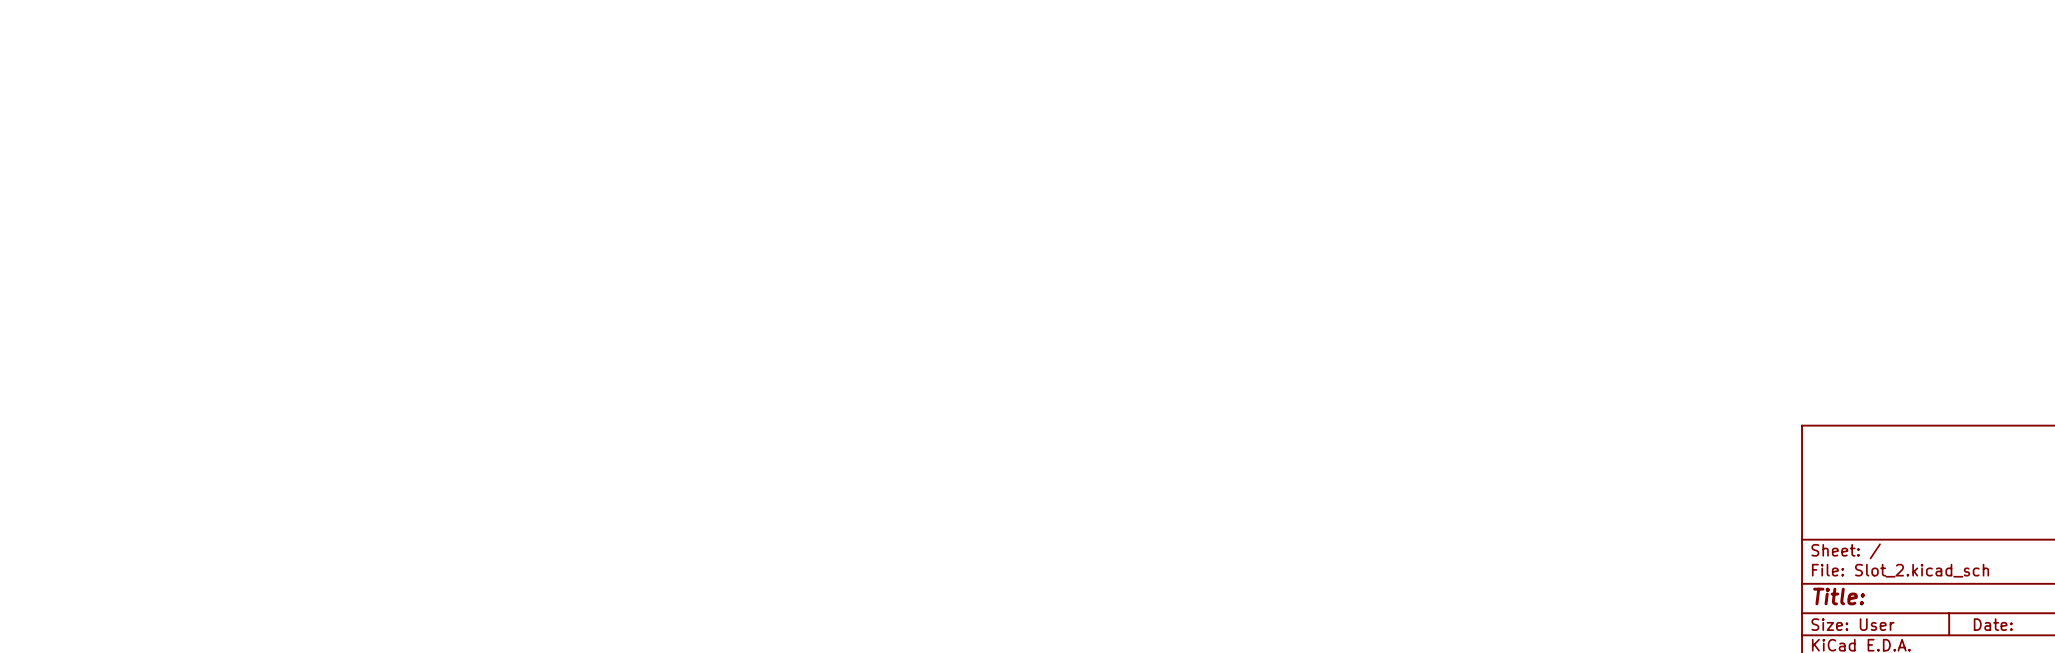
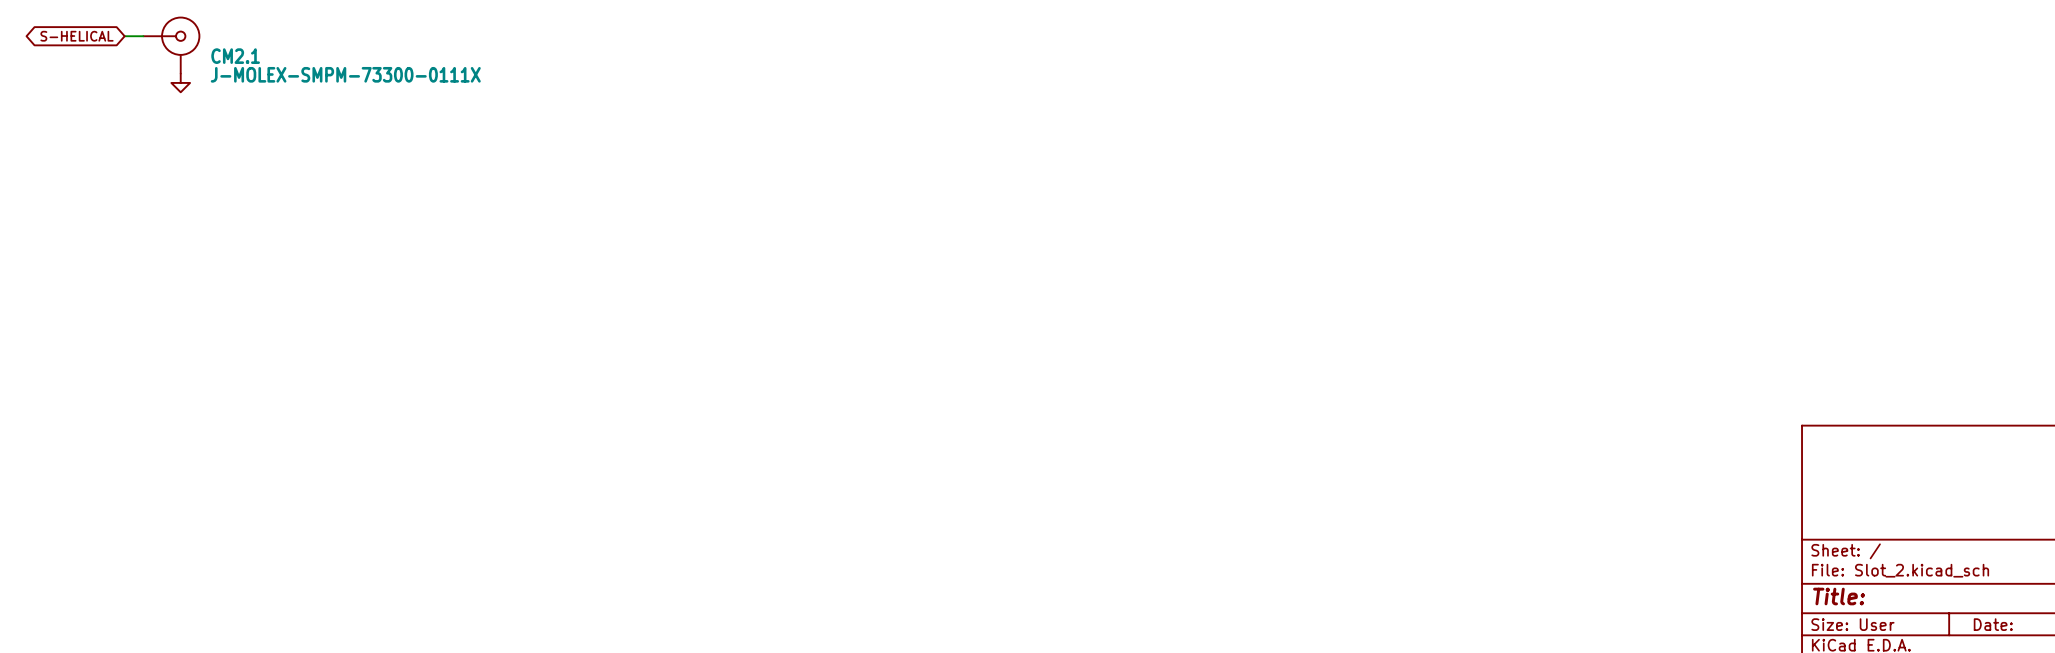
global label: none -> S-HELICAL (76, 36)
wire: none -> (124, 36) (143, 36)
CM2.1: none -> J-MOLEX-SMPM-73300-0111X (171, 45)
power symbol: none -> (180, 82)

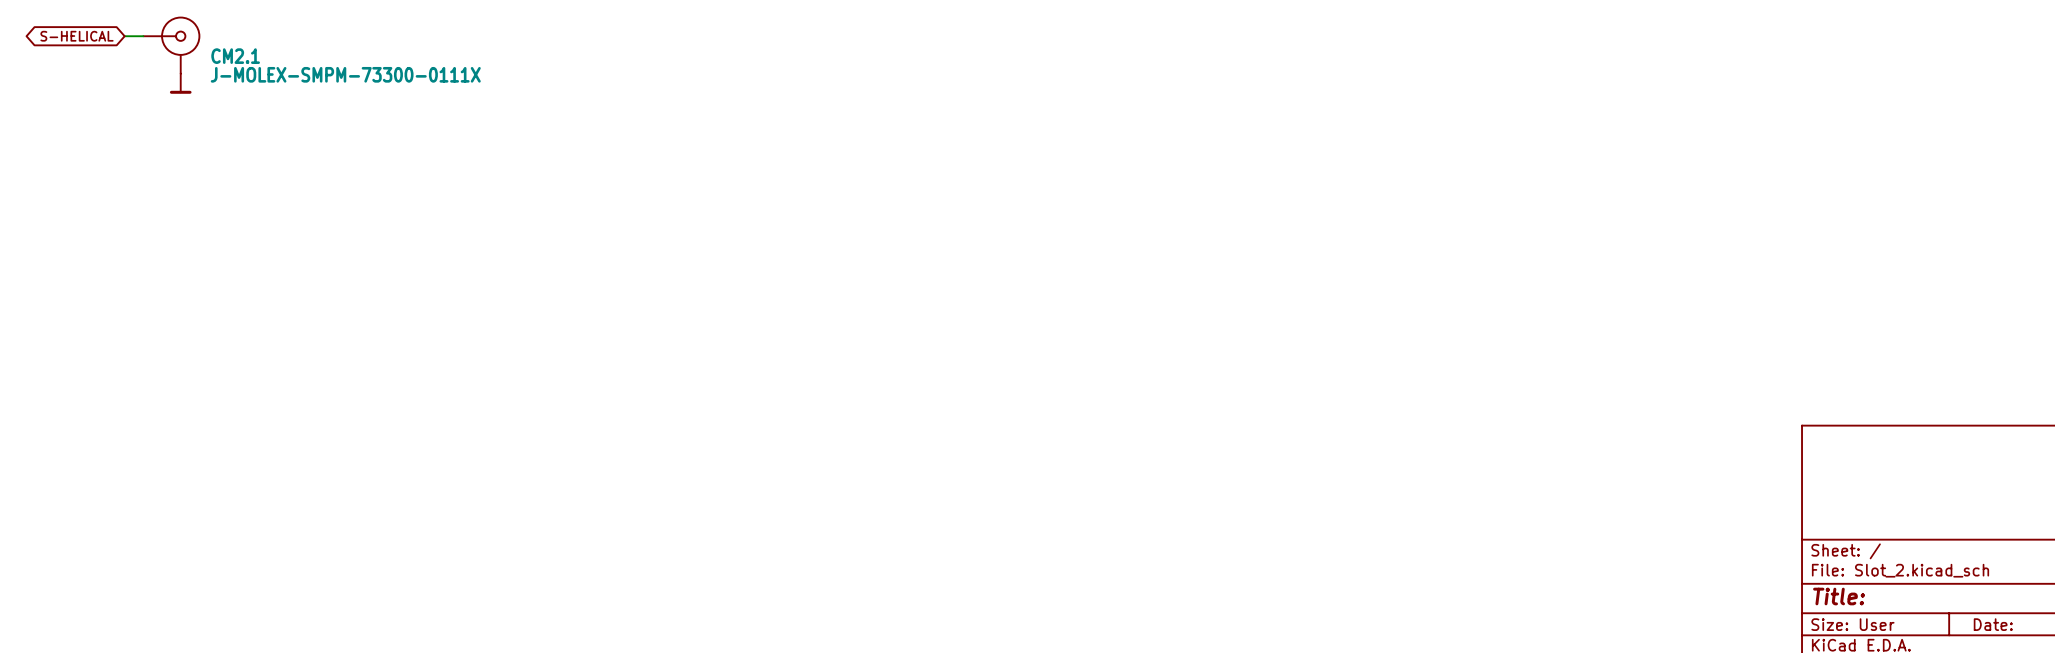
power symbol shape: [171, 73, 191, 93] -> [169, 73, 192, 94]

